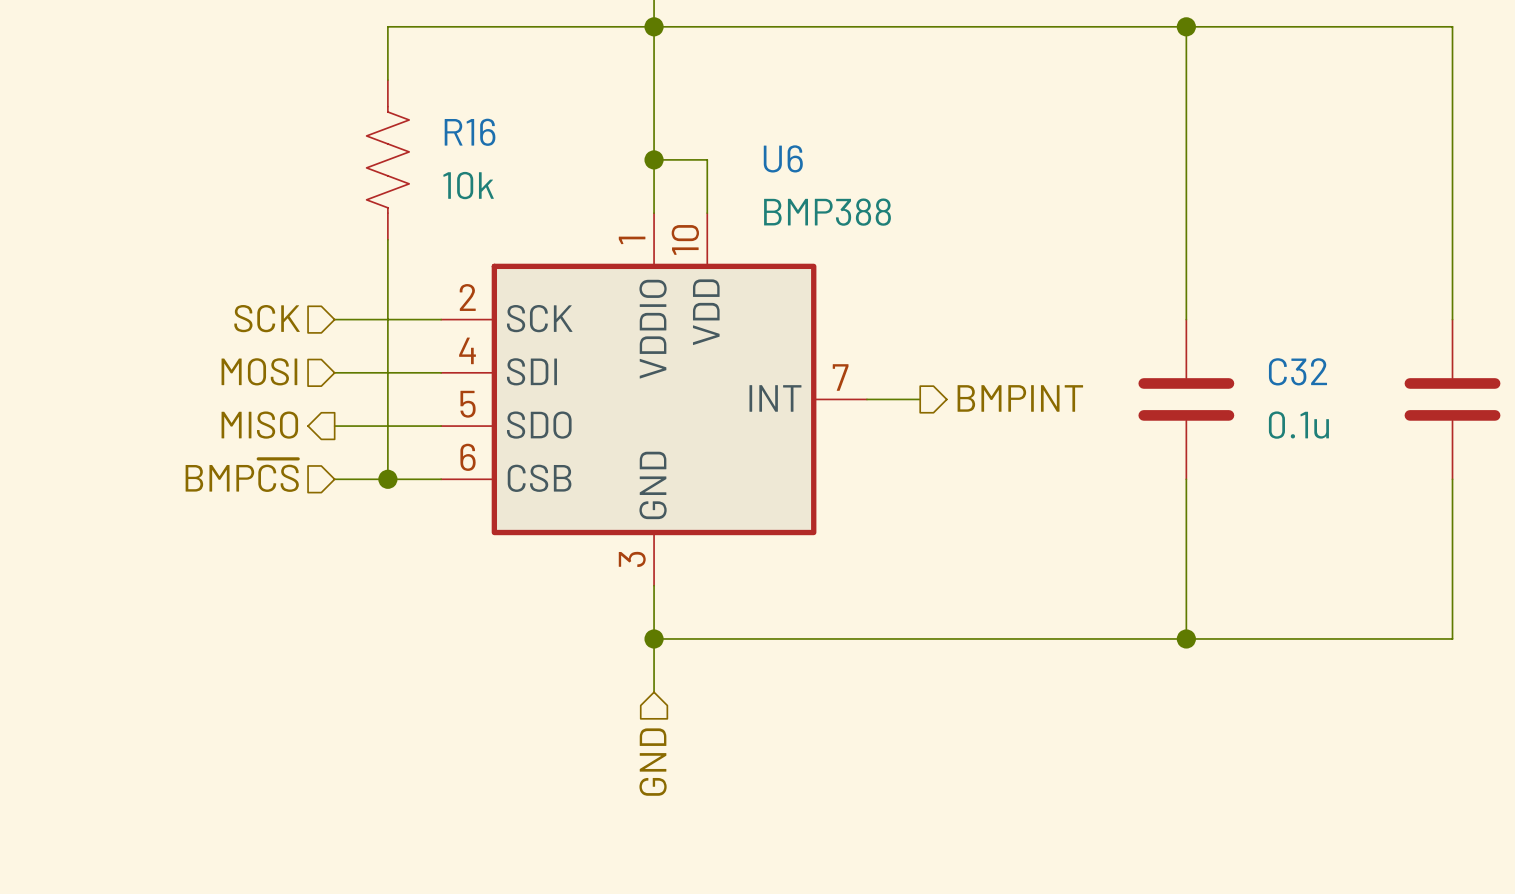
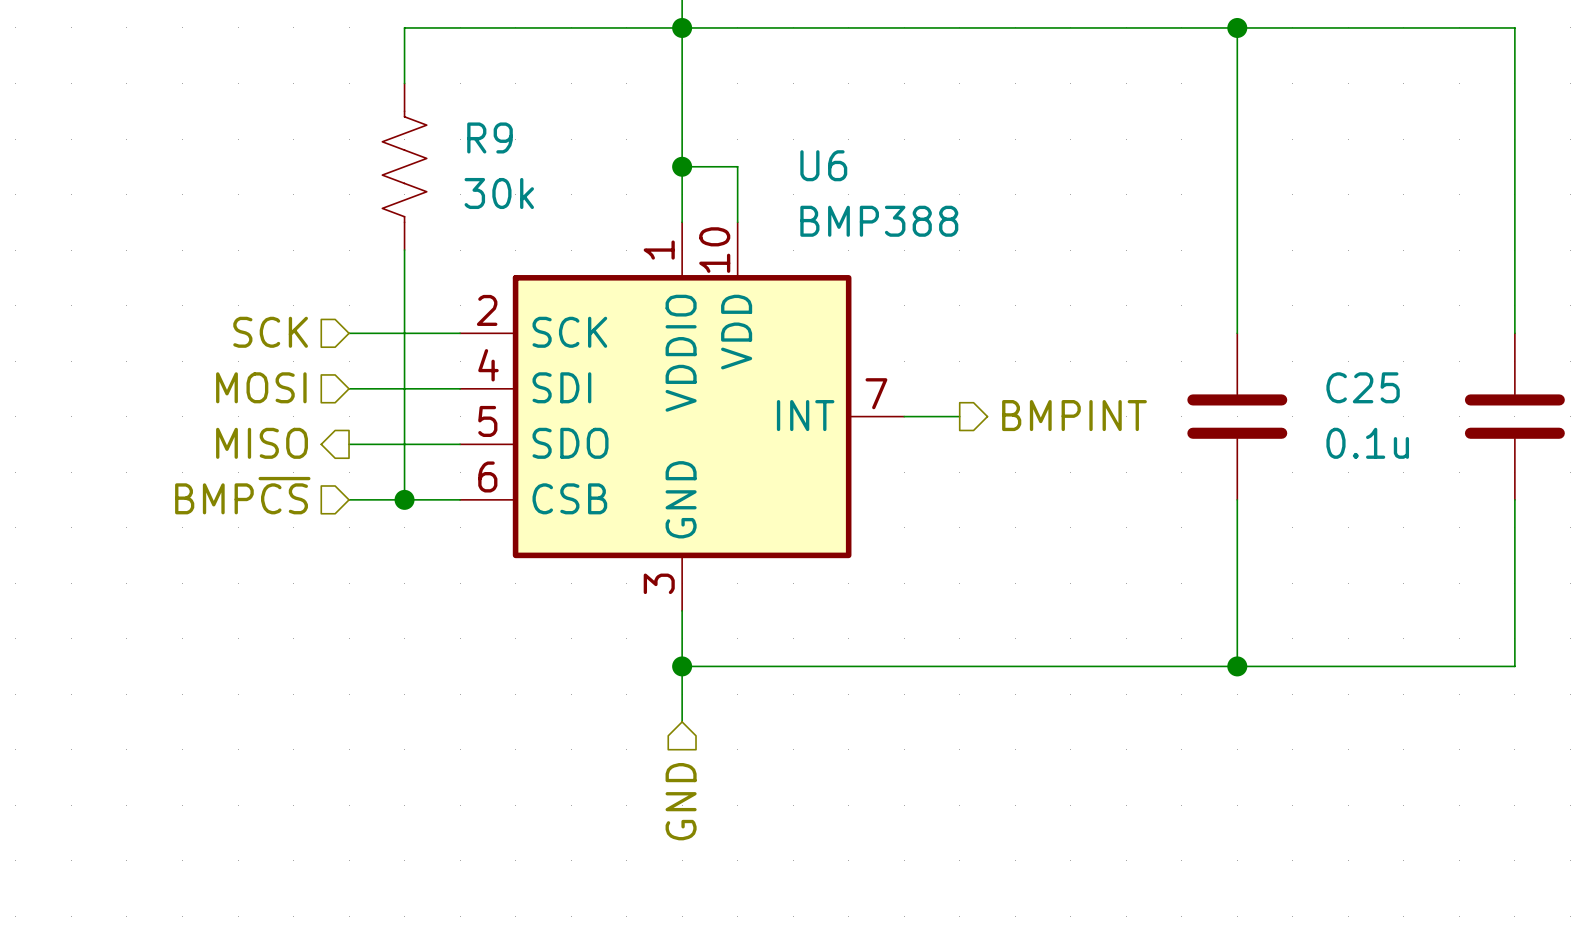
R16 name: R16 (470, 132) -> R9 (490, 137)
R16 value: 10k (468, 185) -> 30k (499, 193)
C32 name: C32 (1297, 371) -> C25 (1363, 387)

